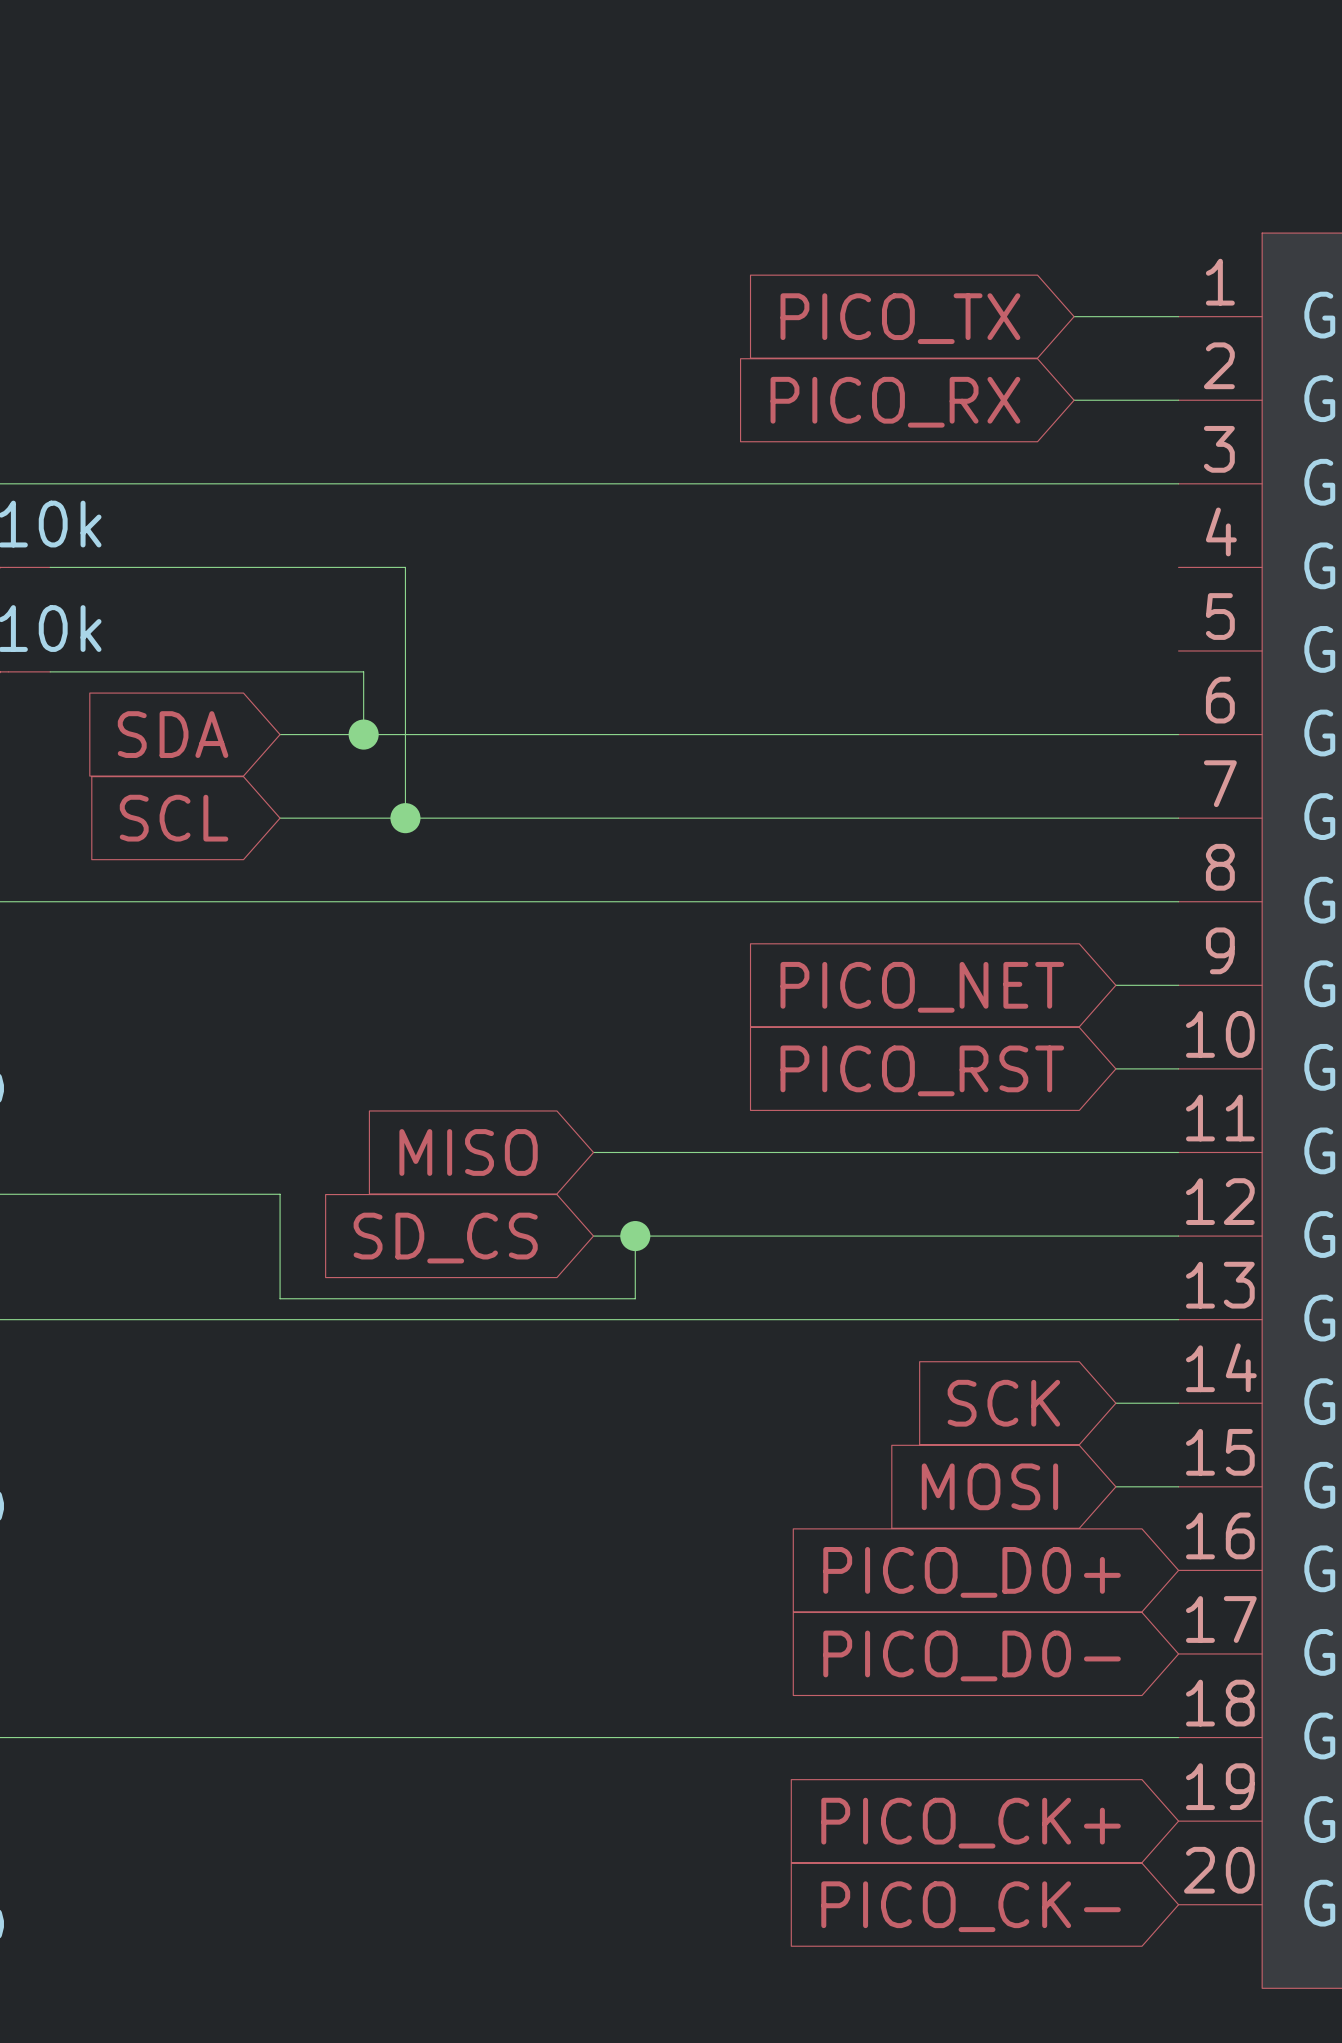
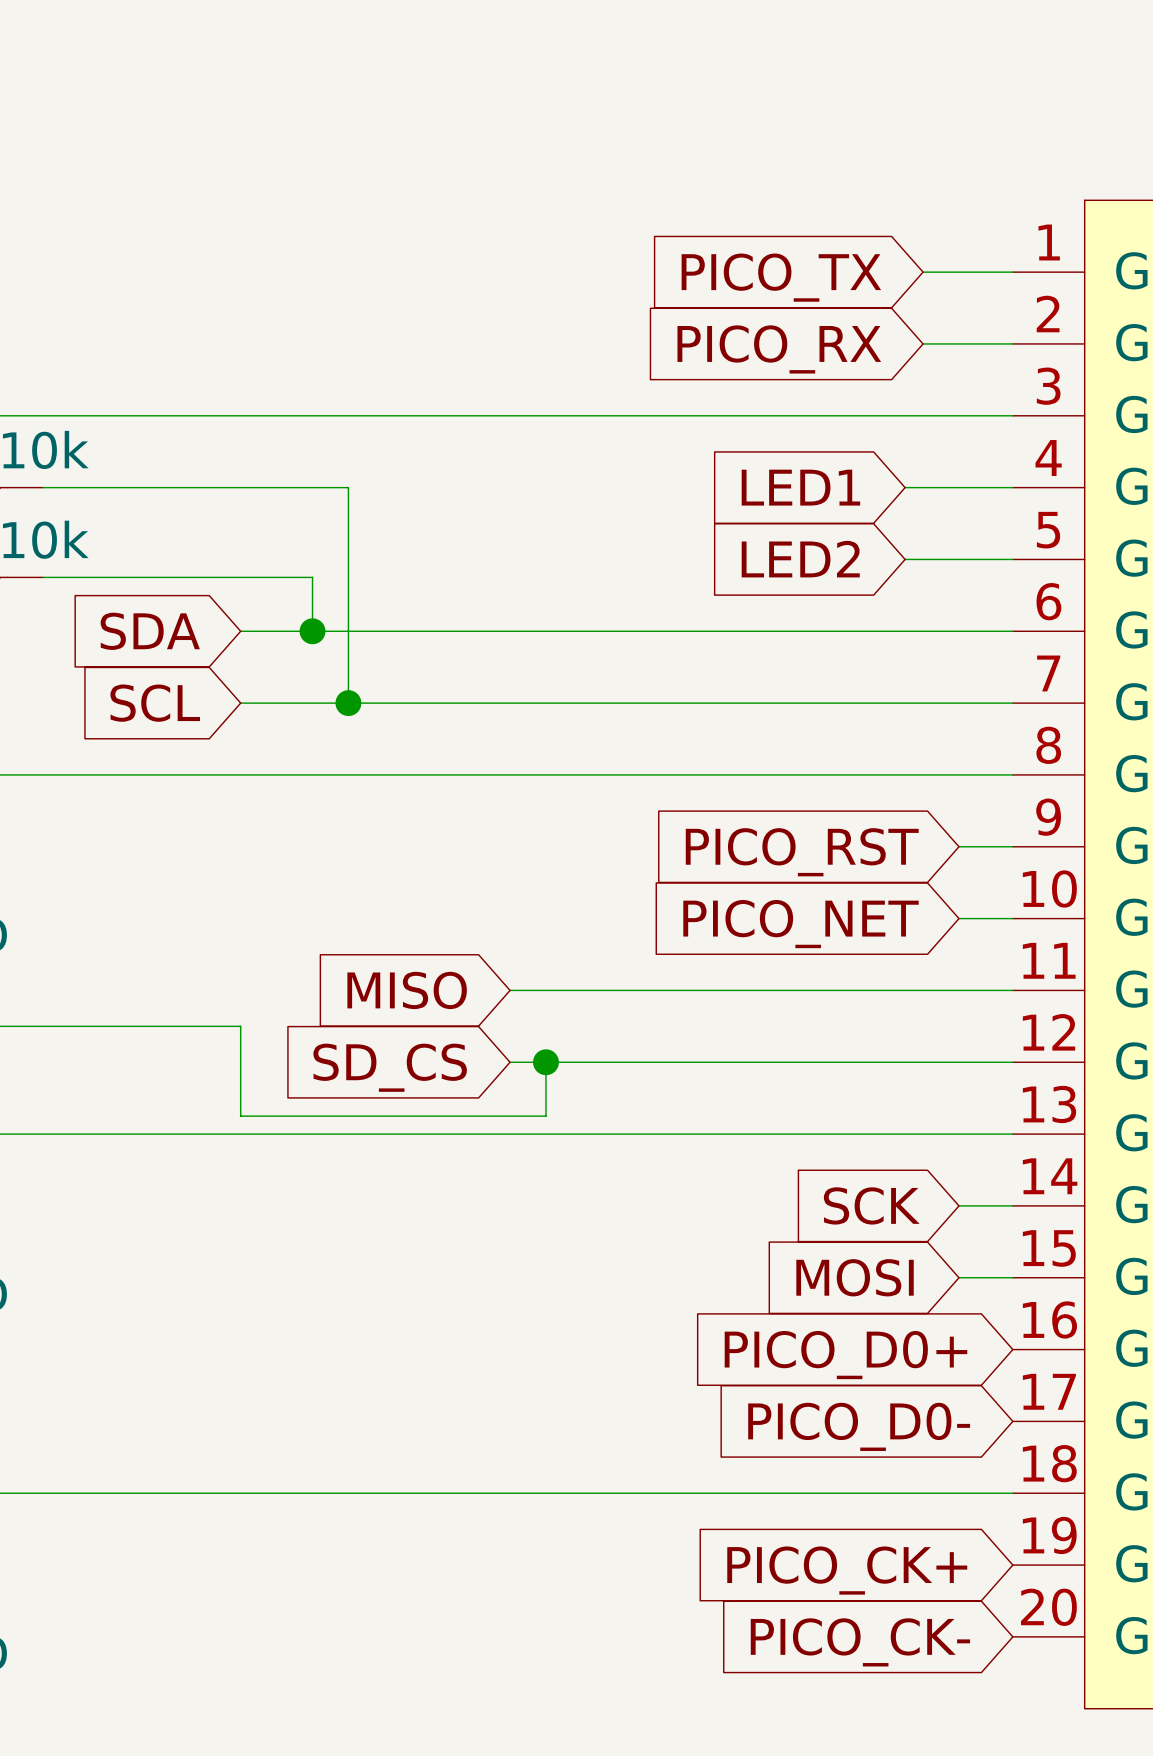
global label: none -> LED1 (800, 487)
wire: none -> (905, 487) (1012, 487)
global label: none -> LED2 (800, 559)
wire: none -> (905, 559) (1012, 559)
global label: PICO_NET (922, 987) -> PICO_RST (802, 852)
global label: PICO_RST (922, 1070) -> PICO_NET (801, 924)

